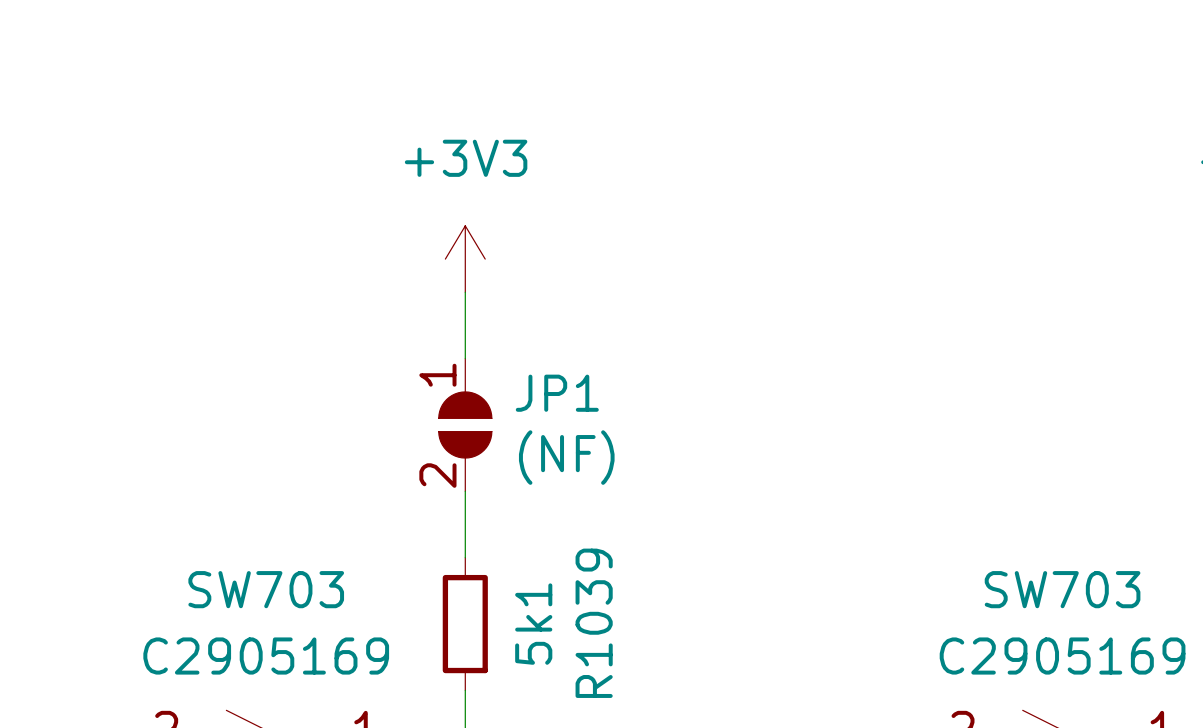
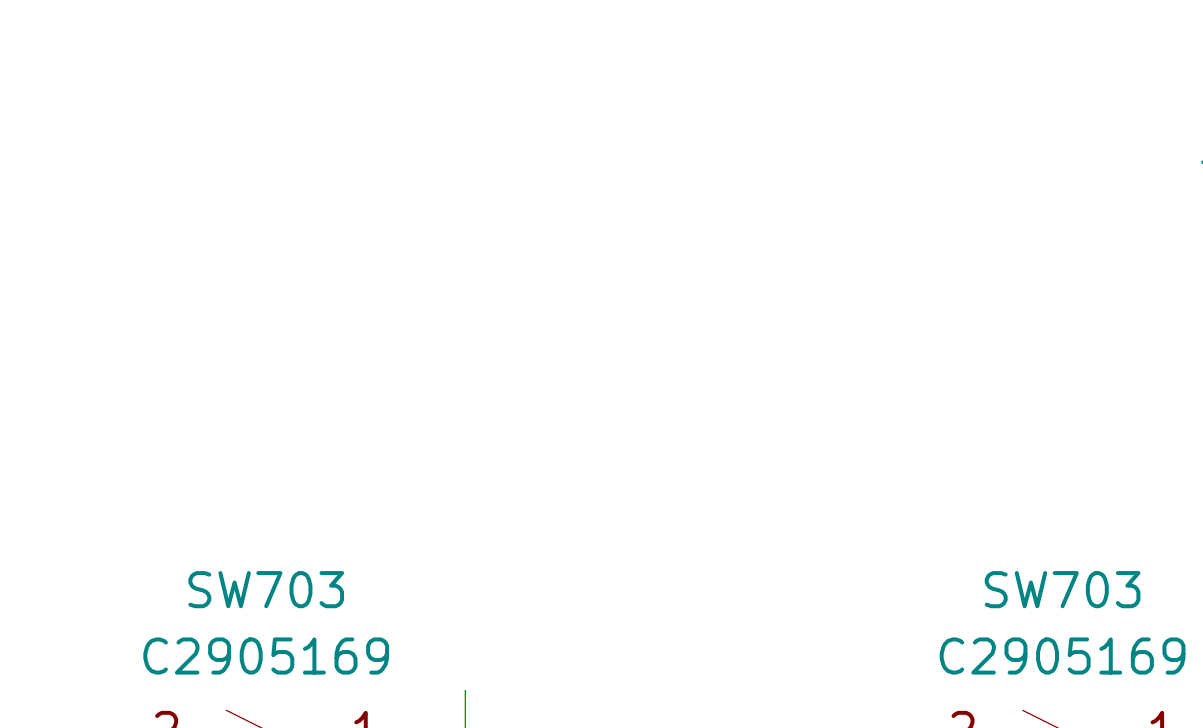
power symbol: +3V3 (465, 259) -> none
wire: (465, 292) (465, 358) -> none
JP1: (NF) (465, 424) -> none
wire: (465, 491) (465, 557) -> none
R1039: 5k1 (465, 624) -> none

